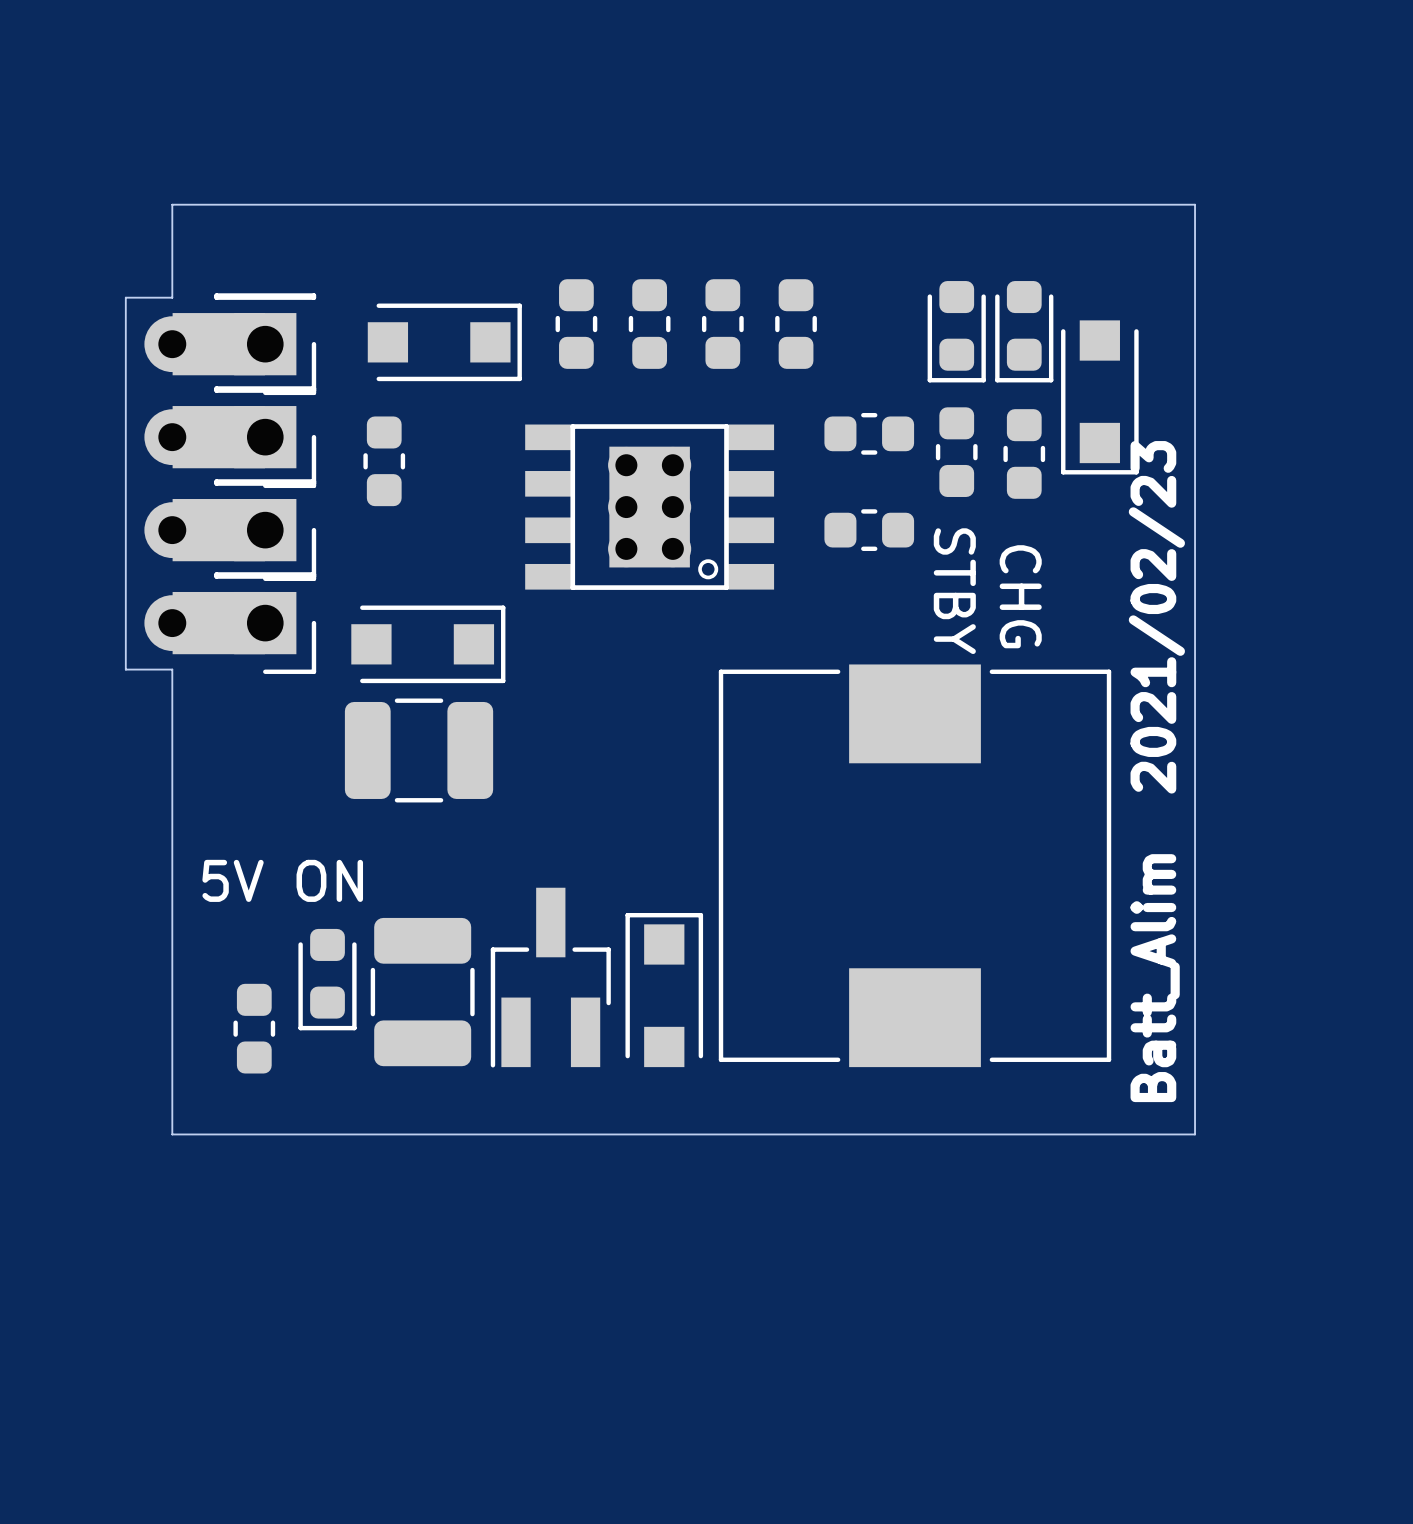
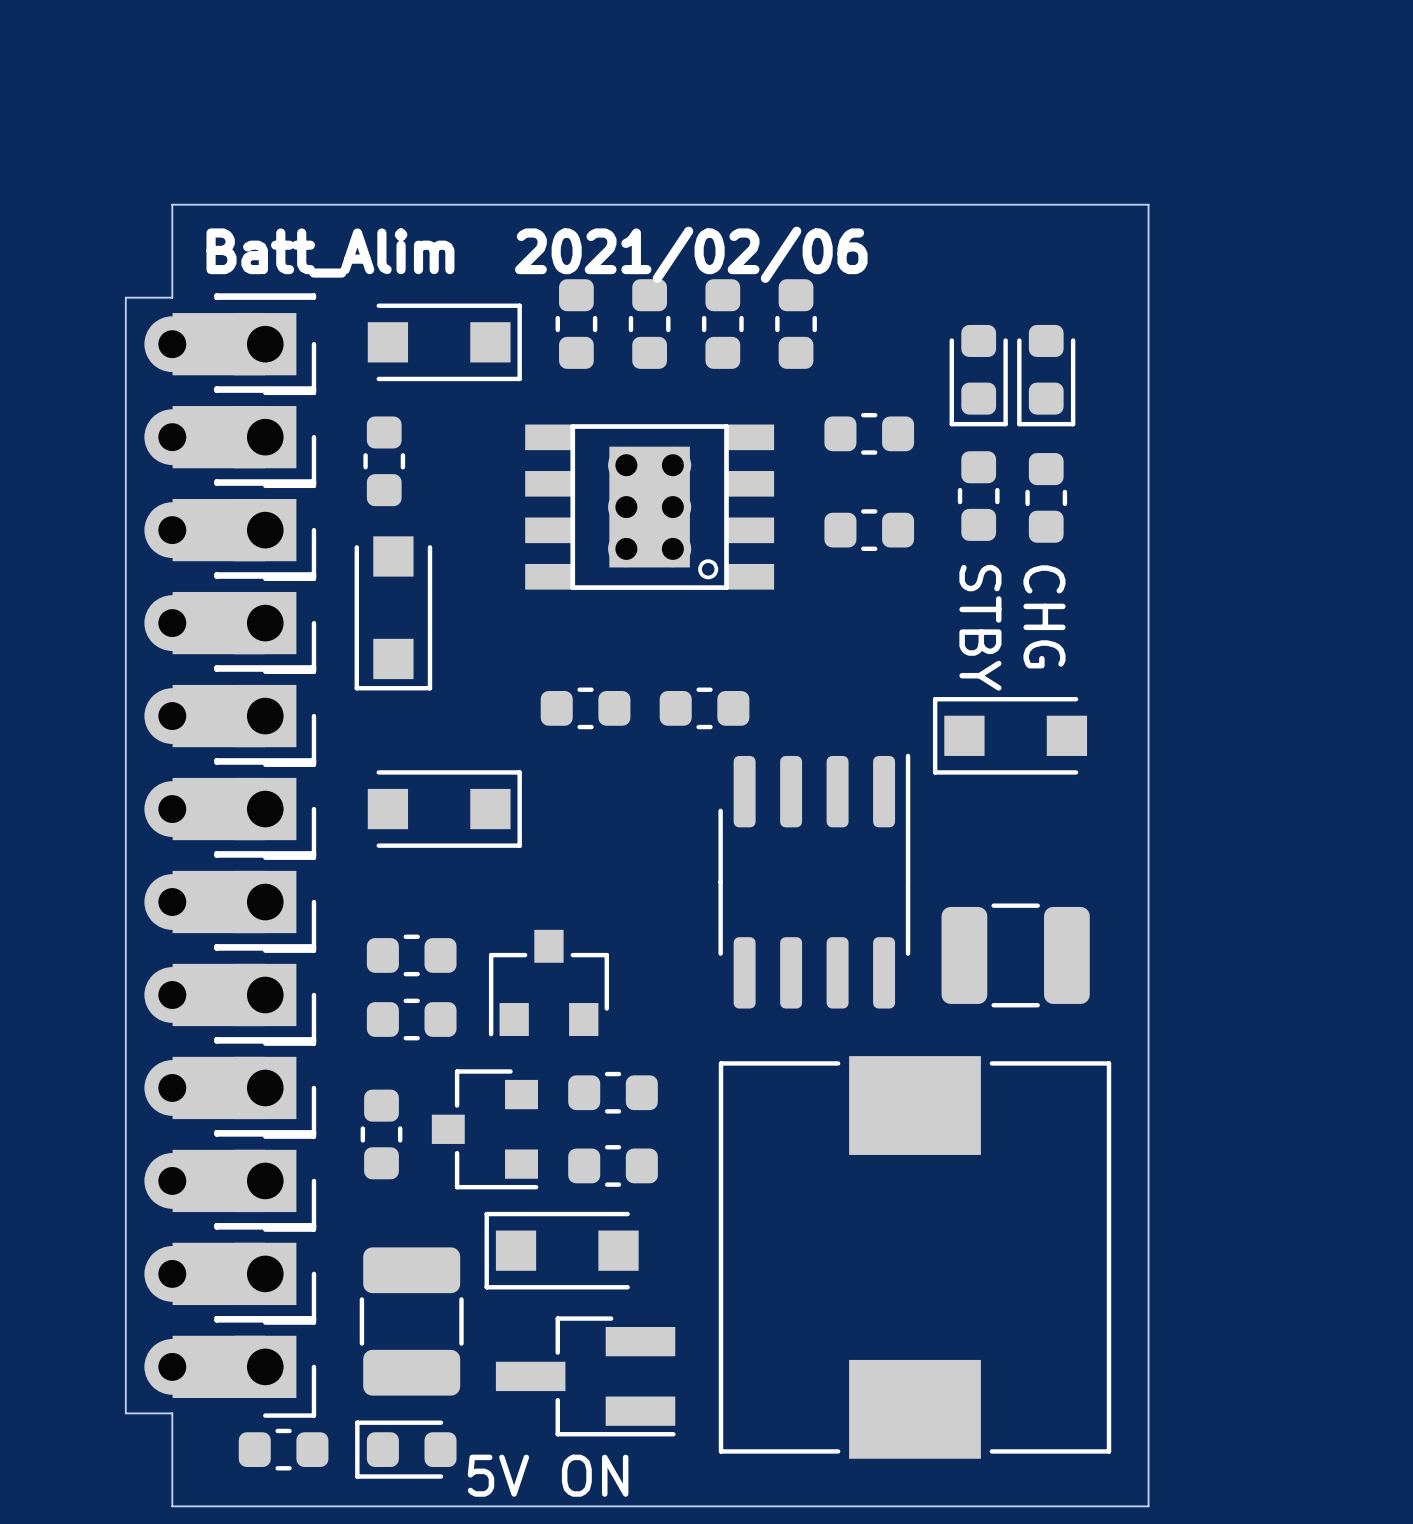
board edge: (1148, 204) (1195, 204) (1195, 1134) (172, 1134) (172, 669) (125, 669) -> (1148, 204) (1148, 1506) (172, 1506) (172, 1413) (125, 1413) (125, 669)
text: none -> Batt_Alim 2021/02/06 (537, 254)
part: (956, 331) -> none
part: (1024, 331) -> none
part: none -> (978, 375)
part: none -> (1046, 375)
part: (1099, 397) -> none
part: (956, 452) -> none
part: (1024, 453) -> none
part: none -> (978, 496)
part: none -> (1046, 497)
text position: STBY (954, 591) -> STBY (980, 627)
text position: CHG (1020, 596) -> CHG (1044, 616)
part rotation: 0° (428, 644) -> 90° clockwise (393, 613)
part: none -> (585, 708)
part: none -> (704, 708)
part: none -> (230, 716)
part: none -> (1009, 735)
part: (419, 750) -> none
text: Batt_Alim 2021/02/23 (1156, 771) -> none
part: none -> (230, 809)
part: none -> (444, 809)
part position: (915, 865) -> (915, 1257)
text position: 5V ON (282, 880) -> 5V ON (548, 1475)
part: none -> (814, 881)
part footprint: [490, 887, 611, 1068] -> [488, 929, 609, 1037]
part: none -> (230, 902)
part: none -> (411, 955)
part: none -> (1015, 955)
part: (327, 979) -> none
part: (664, 990) -> none
part: (422, 992) -> none
part: none -> (230, 994)
part: none -> (411, 1019)
part: (254, 1028) -> none
part: none -> (230, 1087)
part: none -> (613, 1092)
part: none -> (485, 1129)
part: none -> (381, 1134)
part: none -> (613, 1165)
part: none -> (230, 1180)
part: none -> (561, 1250)
part: none -> (230, 1273)
part: none -> (411, 1321)
part: none -> (230, 1366)
part: none -> (585, 1376)
part: none -> (283, 1449)
part: none -> (405, 1449)

